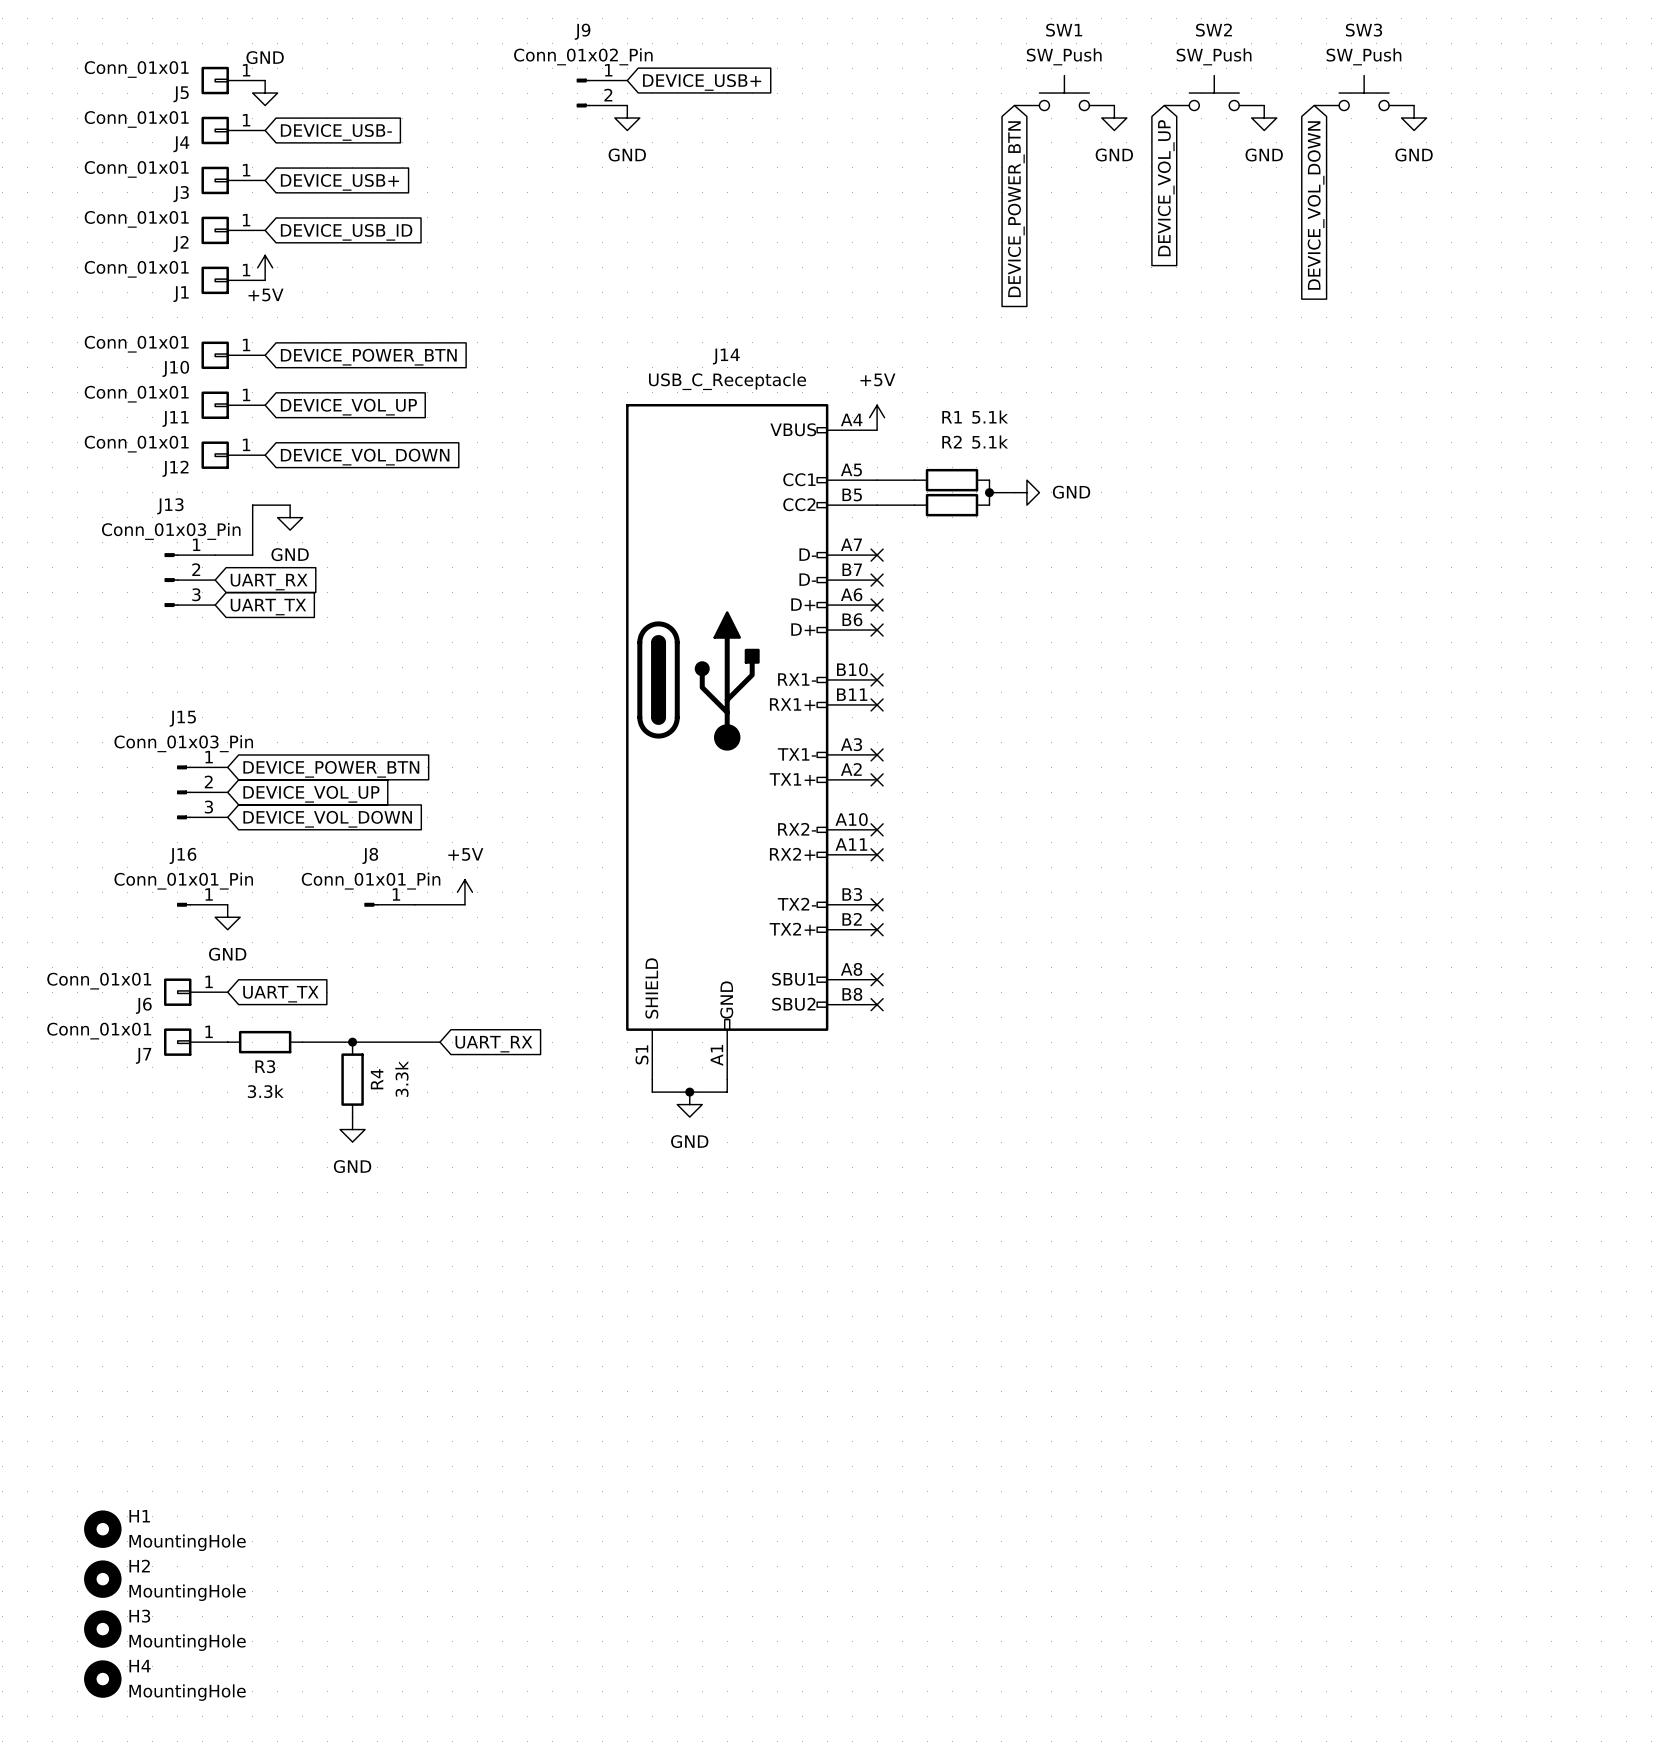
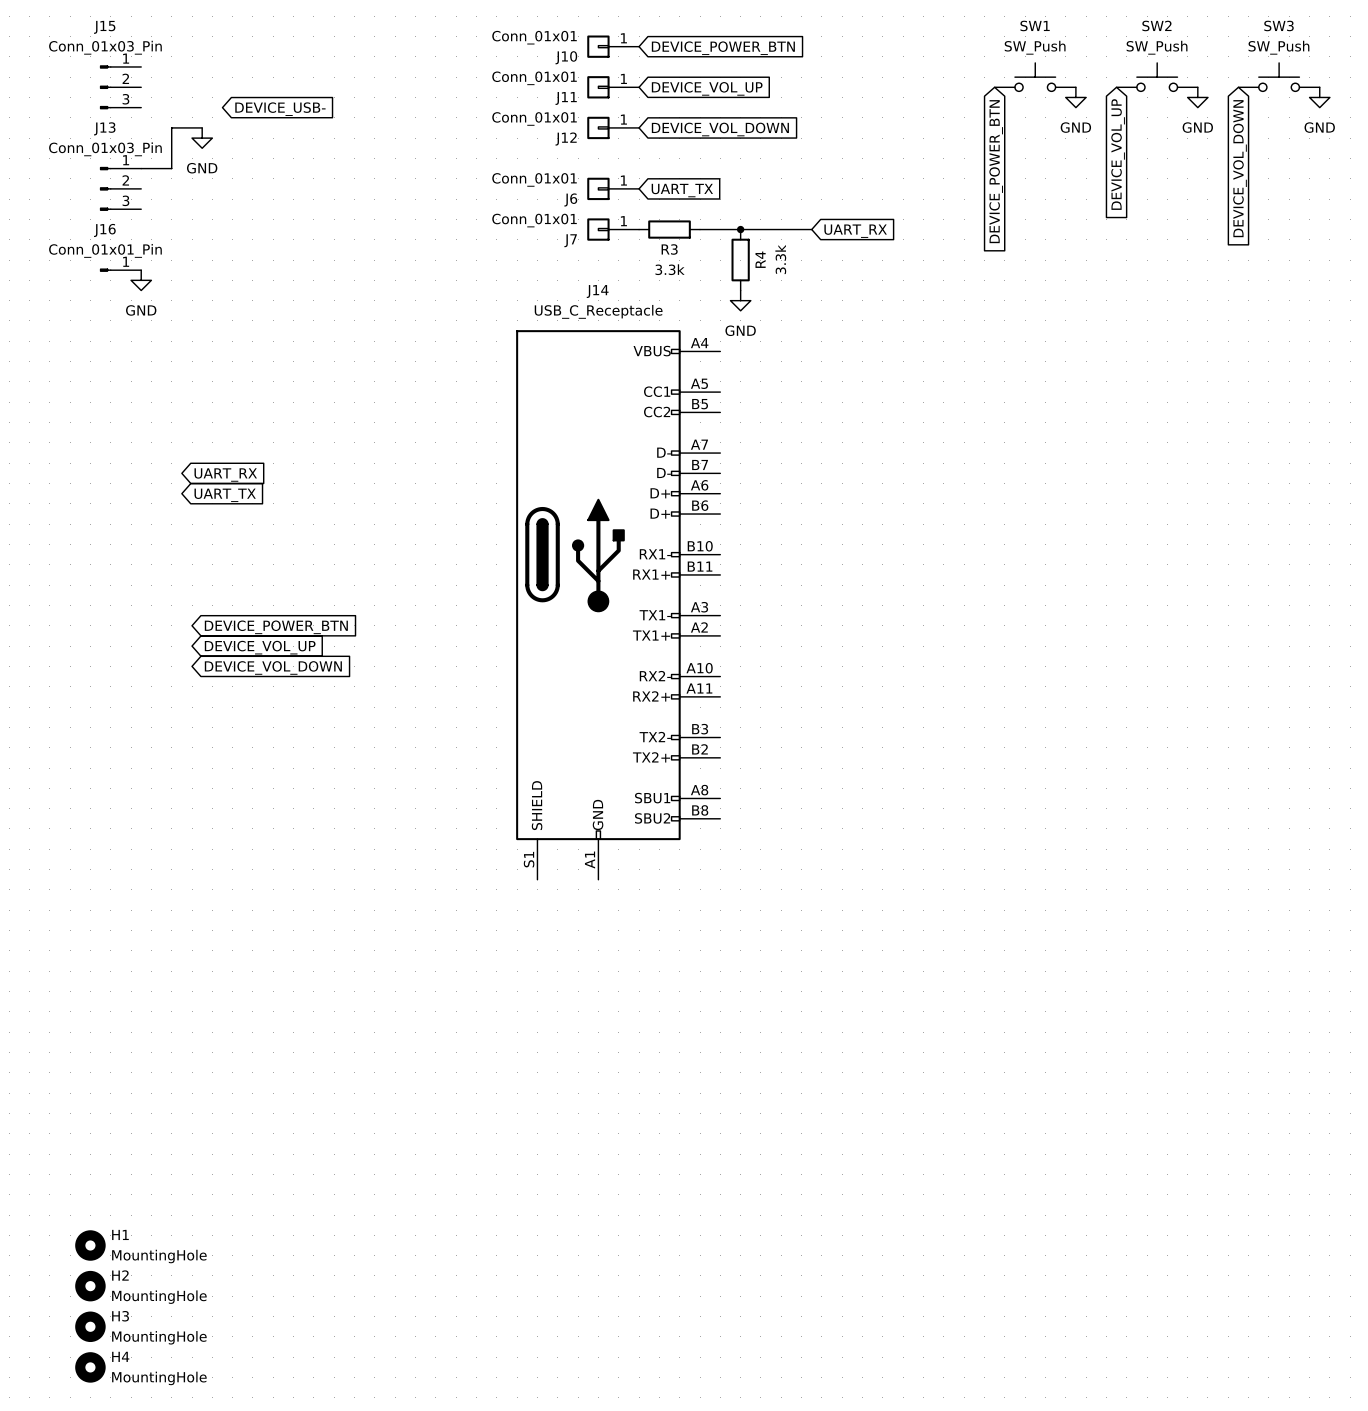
power symbol text position: GND (265, 57) -> GND (202, 168)
global label: none -> DEVICE_POWER_BTN (723, 48)
J5: Conn_01x01 (233, 80) -> none
global label: DEVICE_USB+ (702, 82) -> DEVICE_VOL_UP (707, 88)
power symbol position: GND (265, 93) -> GND (202, 138)
J9: Conn_01x02_Pin (601, 93) -> none
SW1 position: (1064, 93) -> (1035, 77)
SW2 position: (1214, 93) -> (1157, 77)
SW3 position: (1364, 93) -> (1279, 77)
power symbol: GND (627, 118) -> none
power symbol: GND (1114, 118) -> none
power symbol: GND (1264, 118) -> none
power symbol: none -> GND (1075, 97)
power symbol: GND (1414, 118) -> none
power symbol: none -> GND (1197, 97)
power symbol: none -> GND (1319, 97)
J4: Conn_01x01 (233, 130) -> none
wire: none -> (202, 127) (171, 127) (171, 168) (141, 168)
J3: Conn_01x01 (233, 180) -> none
global label: DEVICE_USB+ (339, 182) -> none
global label: DEVICE_VOL_UP (1166, 188) -> none
global label: none -> DEVICE_VOL_UP (1118, 154)
global label position: DEVICE_VOL_DOWN (1316, 205) -> DEVICE_VOL_DOWN (1240, 168)
global label: DEVICE_POWER_BTN (1016, 209) -> DEVICE_VOL_DOWN (720, 129)
global label: none -> DEVICE_POWER_BTN (996, 171)
J2: Conn_01x01 (233, 230) -> none
global label: DEVICE_USB_ID (346, 232) -> none
global label: none -> UART_TX (682, 190)
power symbol: +5V (265, 267) -> none
J1: Conn_01x01 (233, 280) -> none
wire: none -> (700, 229) (811, 229)
junction: none -> (740, 229)
global label: none -> UART_RX (855, 231)
power symbol: none -> GND (141, 280)
J10 position: (233, 355) -> (613, 46)
global label: DEVICE_POWER_BTN (368, 357) -> none
power symbol: none -> GND (740, 300)
J11 position: (233, 405) -> (613, 87)
global label: DEVICE_VOL_UP (348, 407) -> none
power symbol: +5V (877, 417) -> none
J12 position: (233, 455) -> (613, 127)
global label: DEVICE_VOL_DOWN (365, 457) -> none
wire: (877, 480) (914, 480) -> none
R1: 5.1k (952, 480) -> none
wire: (989, 480) (989, 505) -> none
wire: (989, 492) (1014, 492) -> none
junction: (989, 492) -> none
power symbol: GND (1026, 492) -> none
wire: (290, 505) (252, 505) (252, 555) (215, 555) -> none
wire: (877, 505) (914, 505) -> none
R2: 5.1k (952, 505) -> none
power symbol: GND (290, 517) -> none
no-connect mark: (877, 555) -> none
J13 position: (189, 580) -> (120, 188)
no-connect mark: (877, 580) -> none
no-connect mark: (877, 605) -> none
no-connect mark: (877, 630) -> none
no-connect mark: (877, 679) -> none
no-connect mark: (877, 704) -> none
no-connect mark: (877, 754) -> none
no-connect mark: (877, 779) -> none
J15 position: (202, 792) -> (120, 87)
no-connect mark: (877, 829) -> none
no-connect mark: (877, 854) -> none
power symbol: +5V (464, 892) -> none
J16 position: (202, 904) -> (120, 270)
J8: Conn_01x01_Pin (389, 904) -> none
wire: (415, 904) (464, 904) -> none
no-connect mark: (877, 904) -> none
power symbol: GND (227, 917) -> none
no-connect mark: (877, 929) -> none
no-connect mark: (877, 979) -> none
J6 position: (195, 992) -> (613, 188)
global label: UART_TX (280, 994) -> none
no-connect mark: (877, 1004) -> none
J7 position: (195, 1042) -> (613, 229)
R3 position: (265, 1042) -> (669, 229)
wire: (302, 1042) (439, 1042) -> none
junction: (352, 1042) -> none
global label: UART_RX (493, 1044) -> none
R4 position: (352, 1079) -> (740, 260)
wire: (652, 1079) (652, 1092) (727, 1092) (727, 1079) -> none
junction: (689, 1092) -> none
power symbol: GND (689, 1104) -> none
power symbol: GND (352, 1129) -> none

